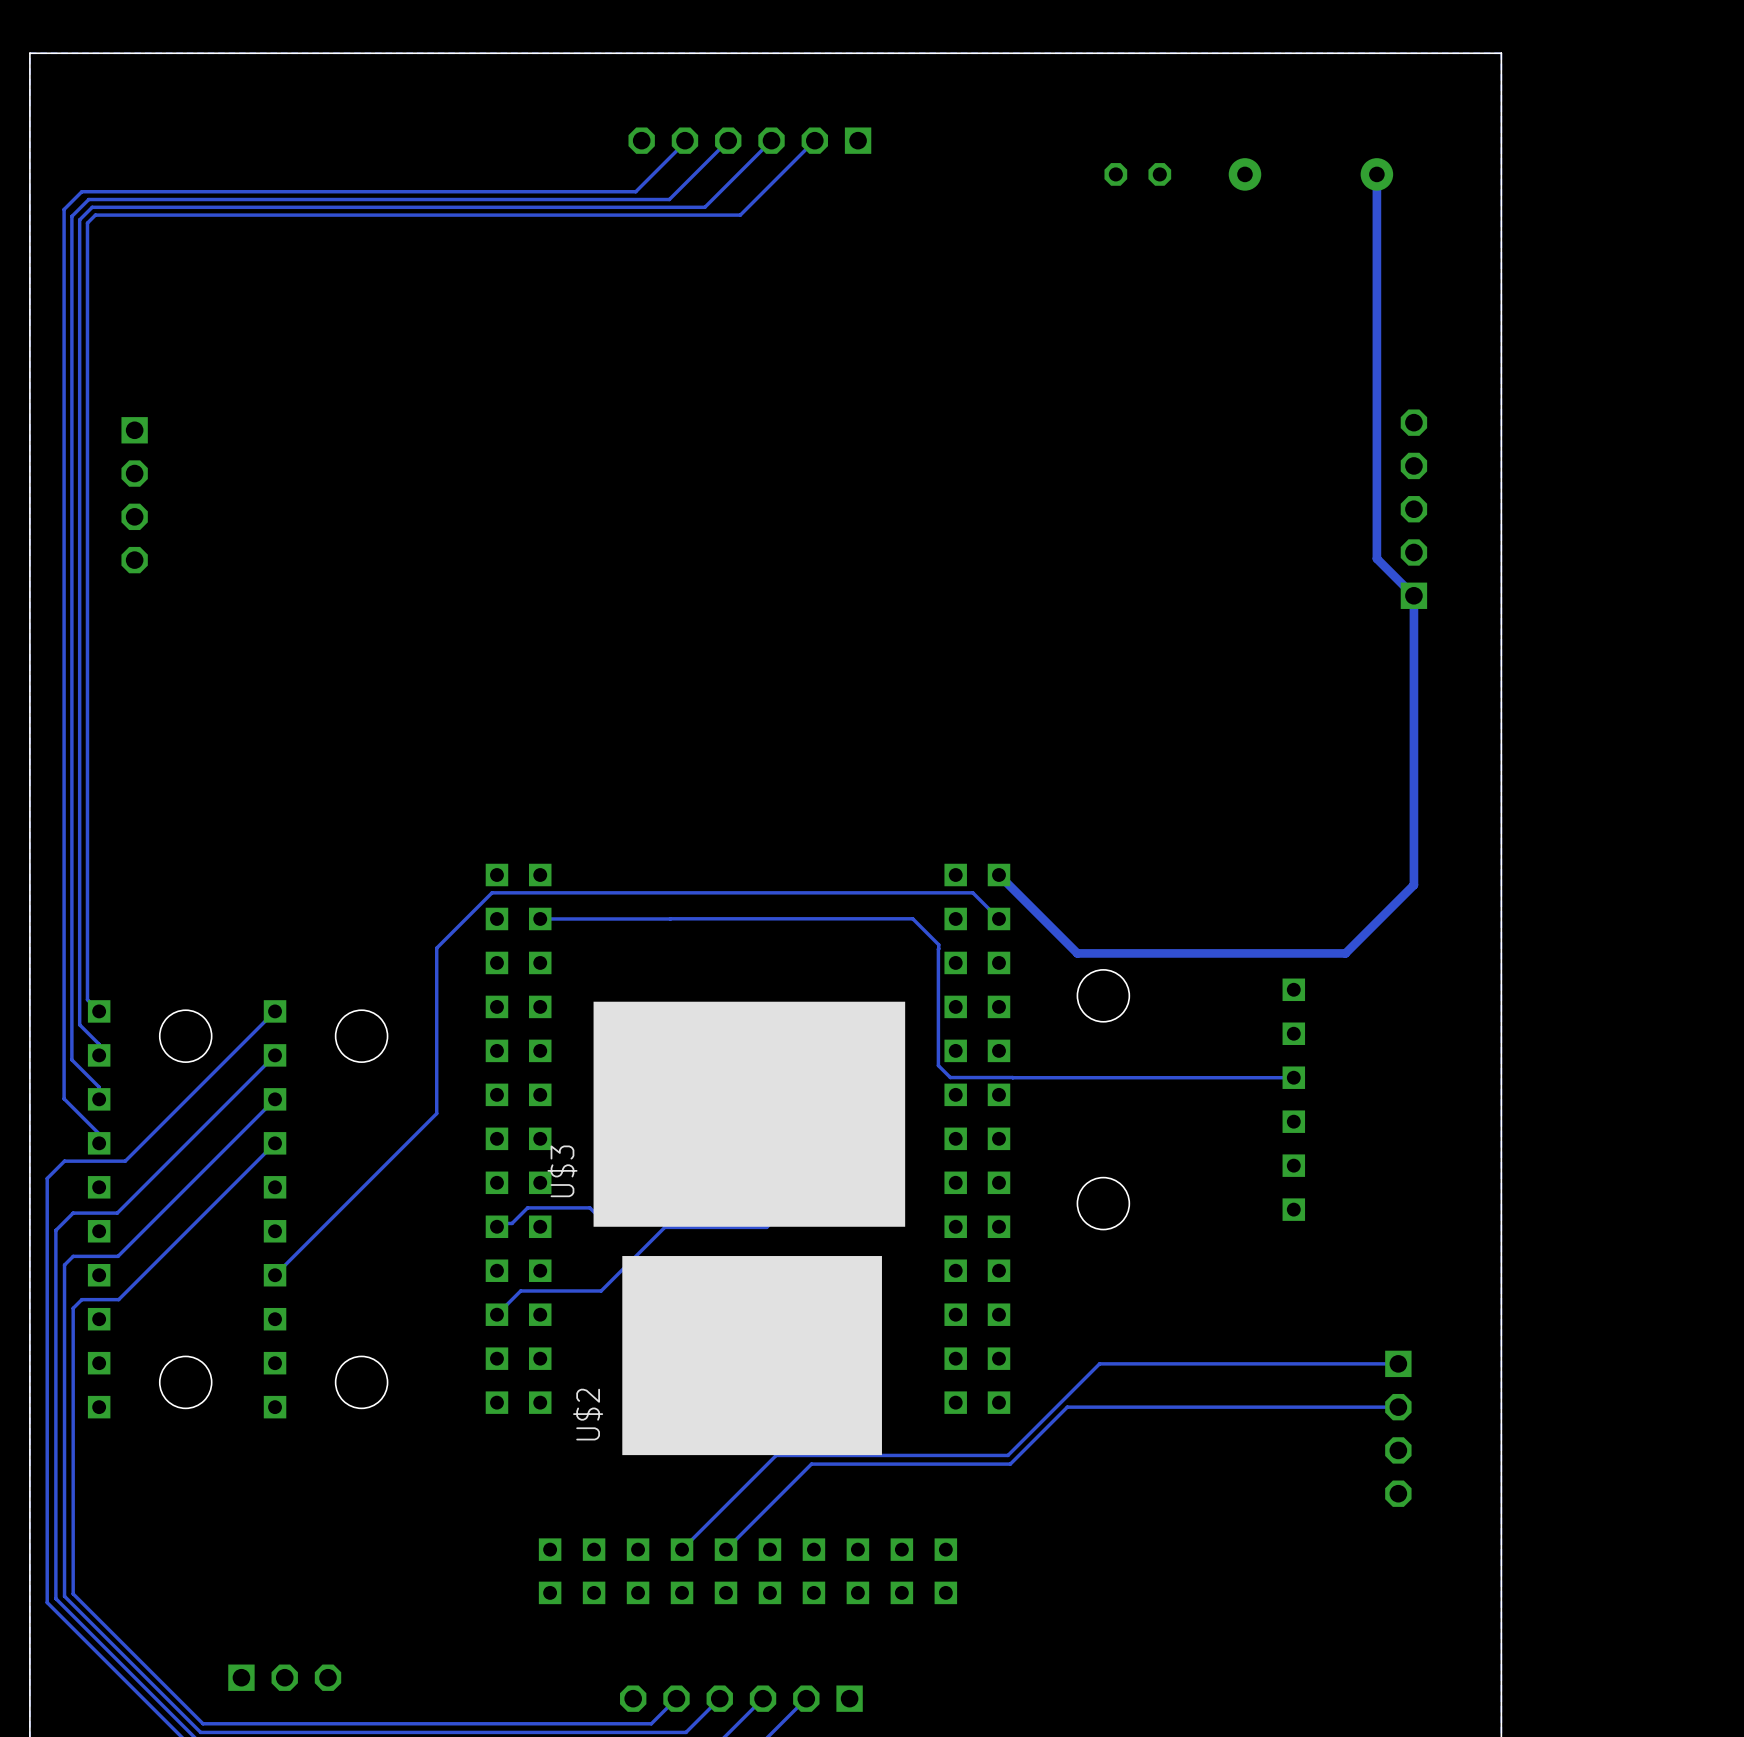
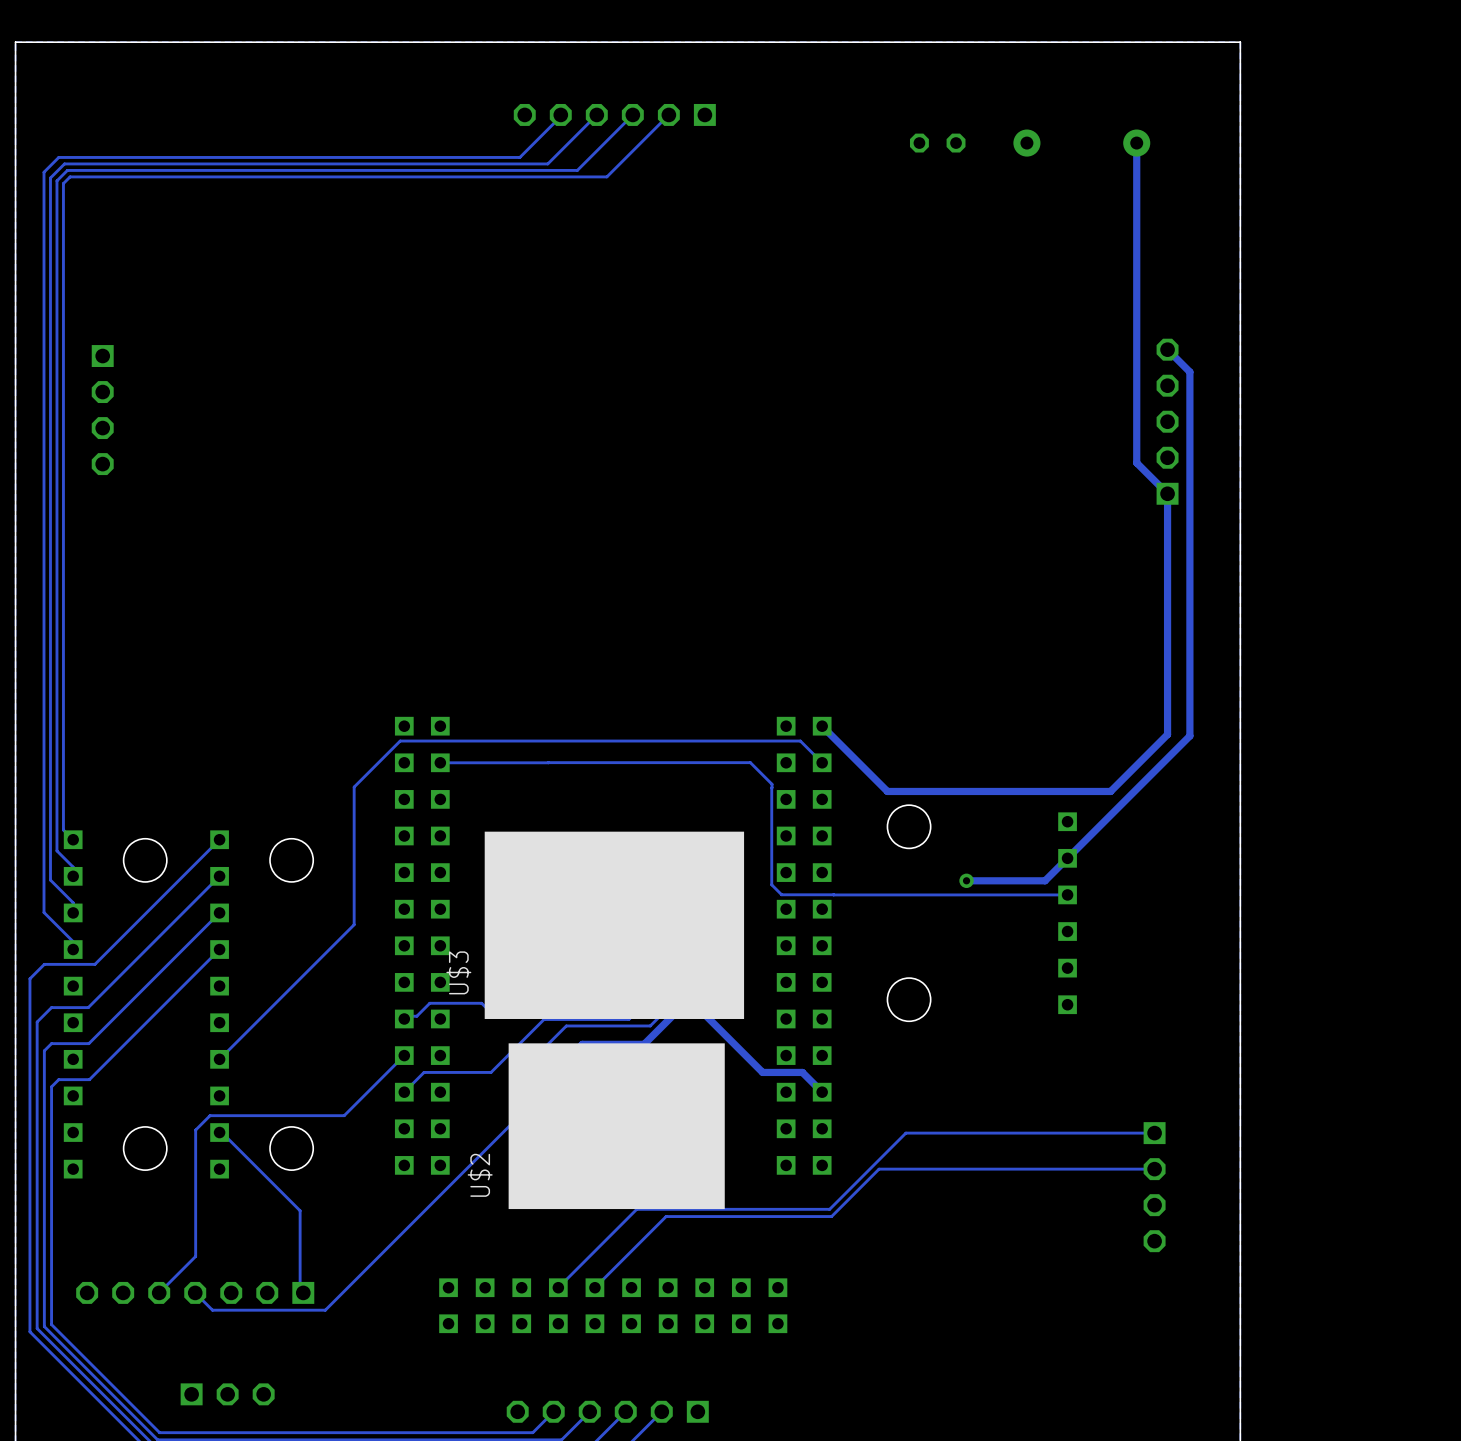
track: none -> (1167, 349) (1189, 372) (1189, 735) (1045, 880) (966, 880)
track: none -> (687, 853) (671, 869) (671, 1005) (650, 1025) (566, 1025) (541, 1050) (541, 1094) (325, 1310) (212, 1310) (195, 1292)
via: none -> (966, 880)
track: none -> (404, 1055) (344, 1115) (210, 1115) (195, 1130) (195, 1256) (159, 1292)
track: none -> (561, 1064) (582, 1044) (644, 1044) (687, 1000) (687, 997) (762, 1072) (802, 1072) (822, 1092)
track: none -> (219, 1132) (222, 1132) (300, 1210) (300, 1291)
part: none -> (195, 1292)

